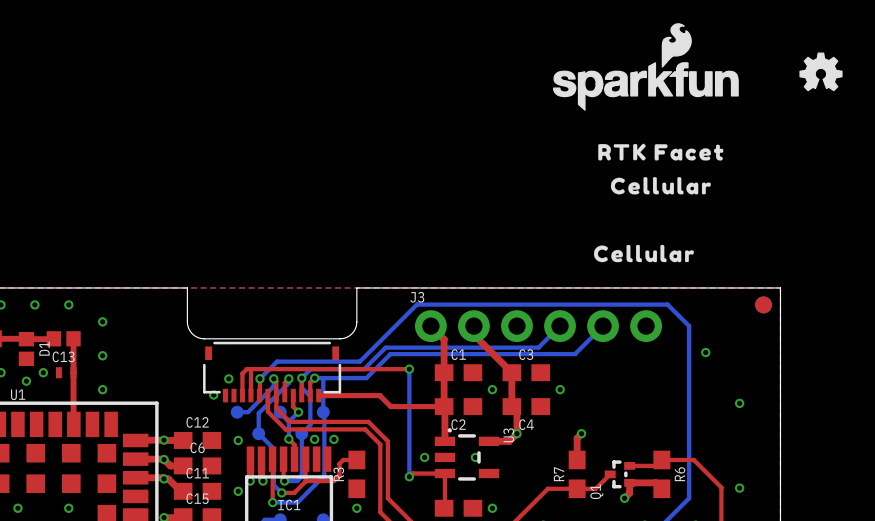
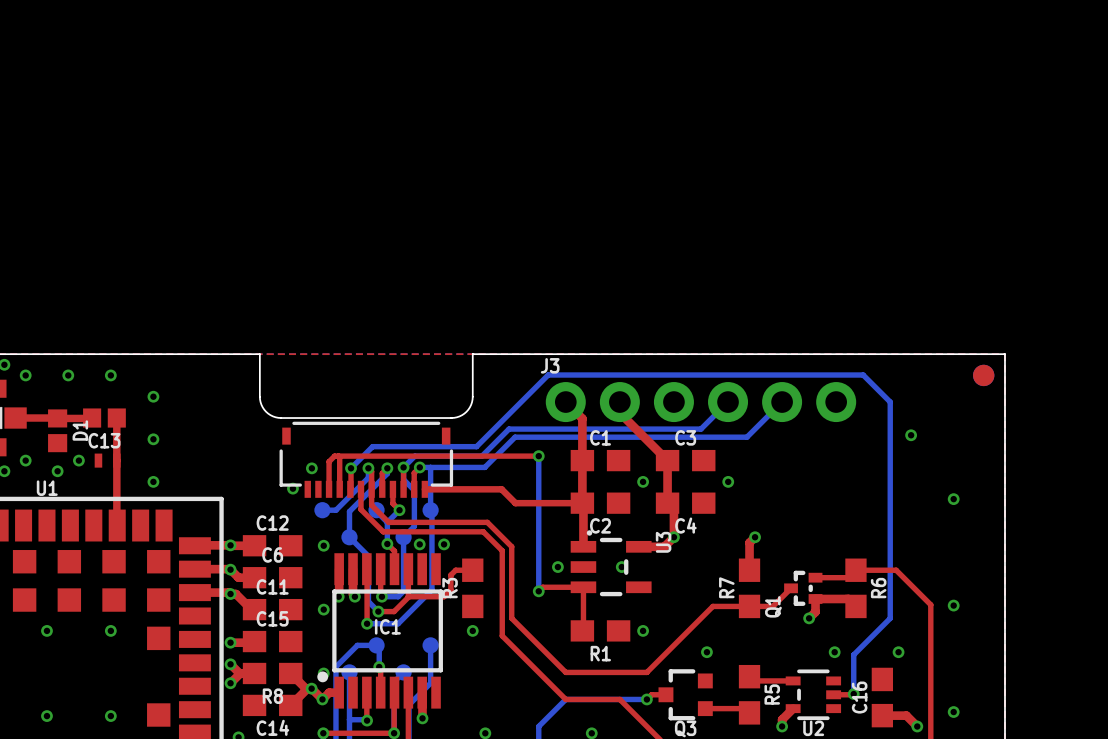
drawing: [552, 23, 739, 111] -> none
drawing: [799, 52, 843, 92] -> none
drawing: [598, 143, 724, 195] -> none
drawing: [593, 244, 694, 263] -> none

